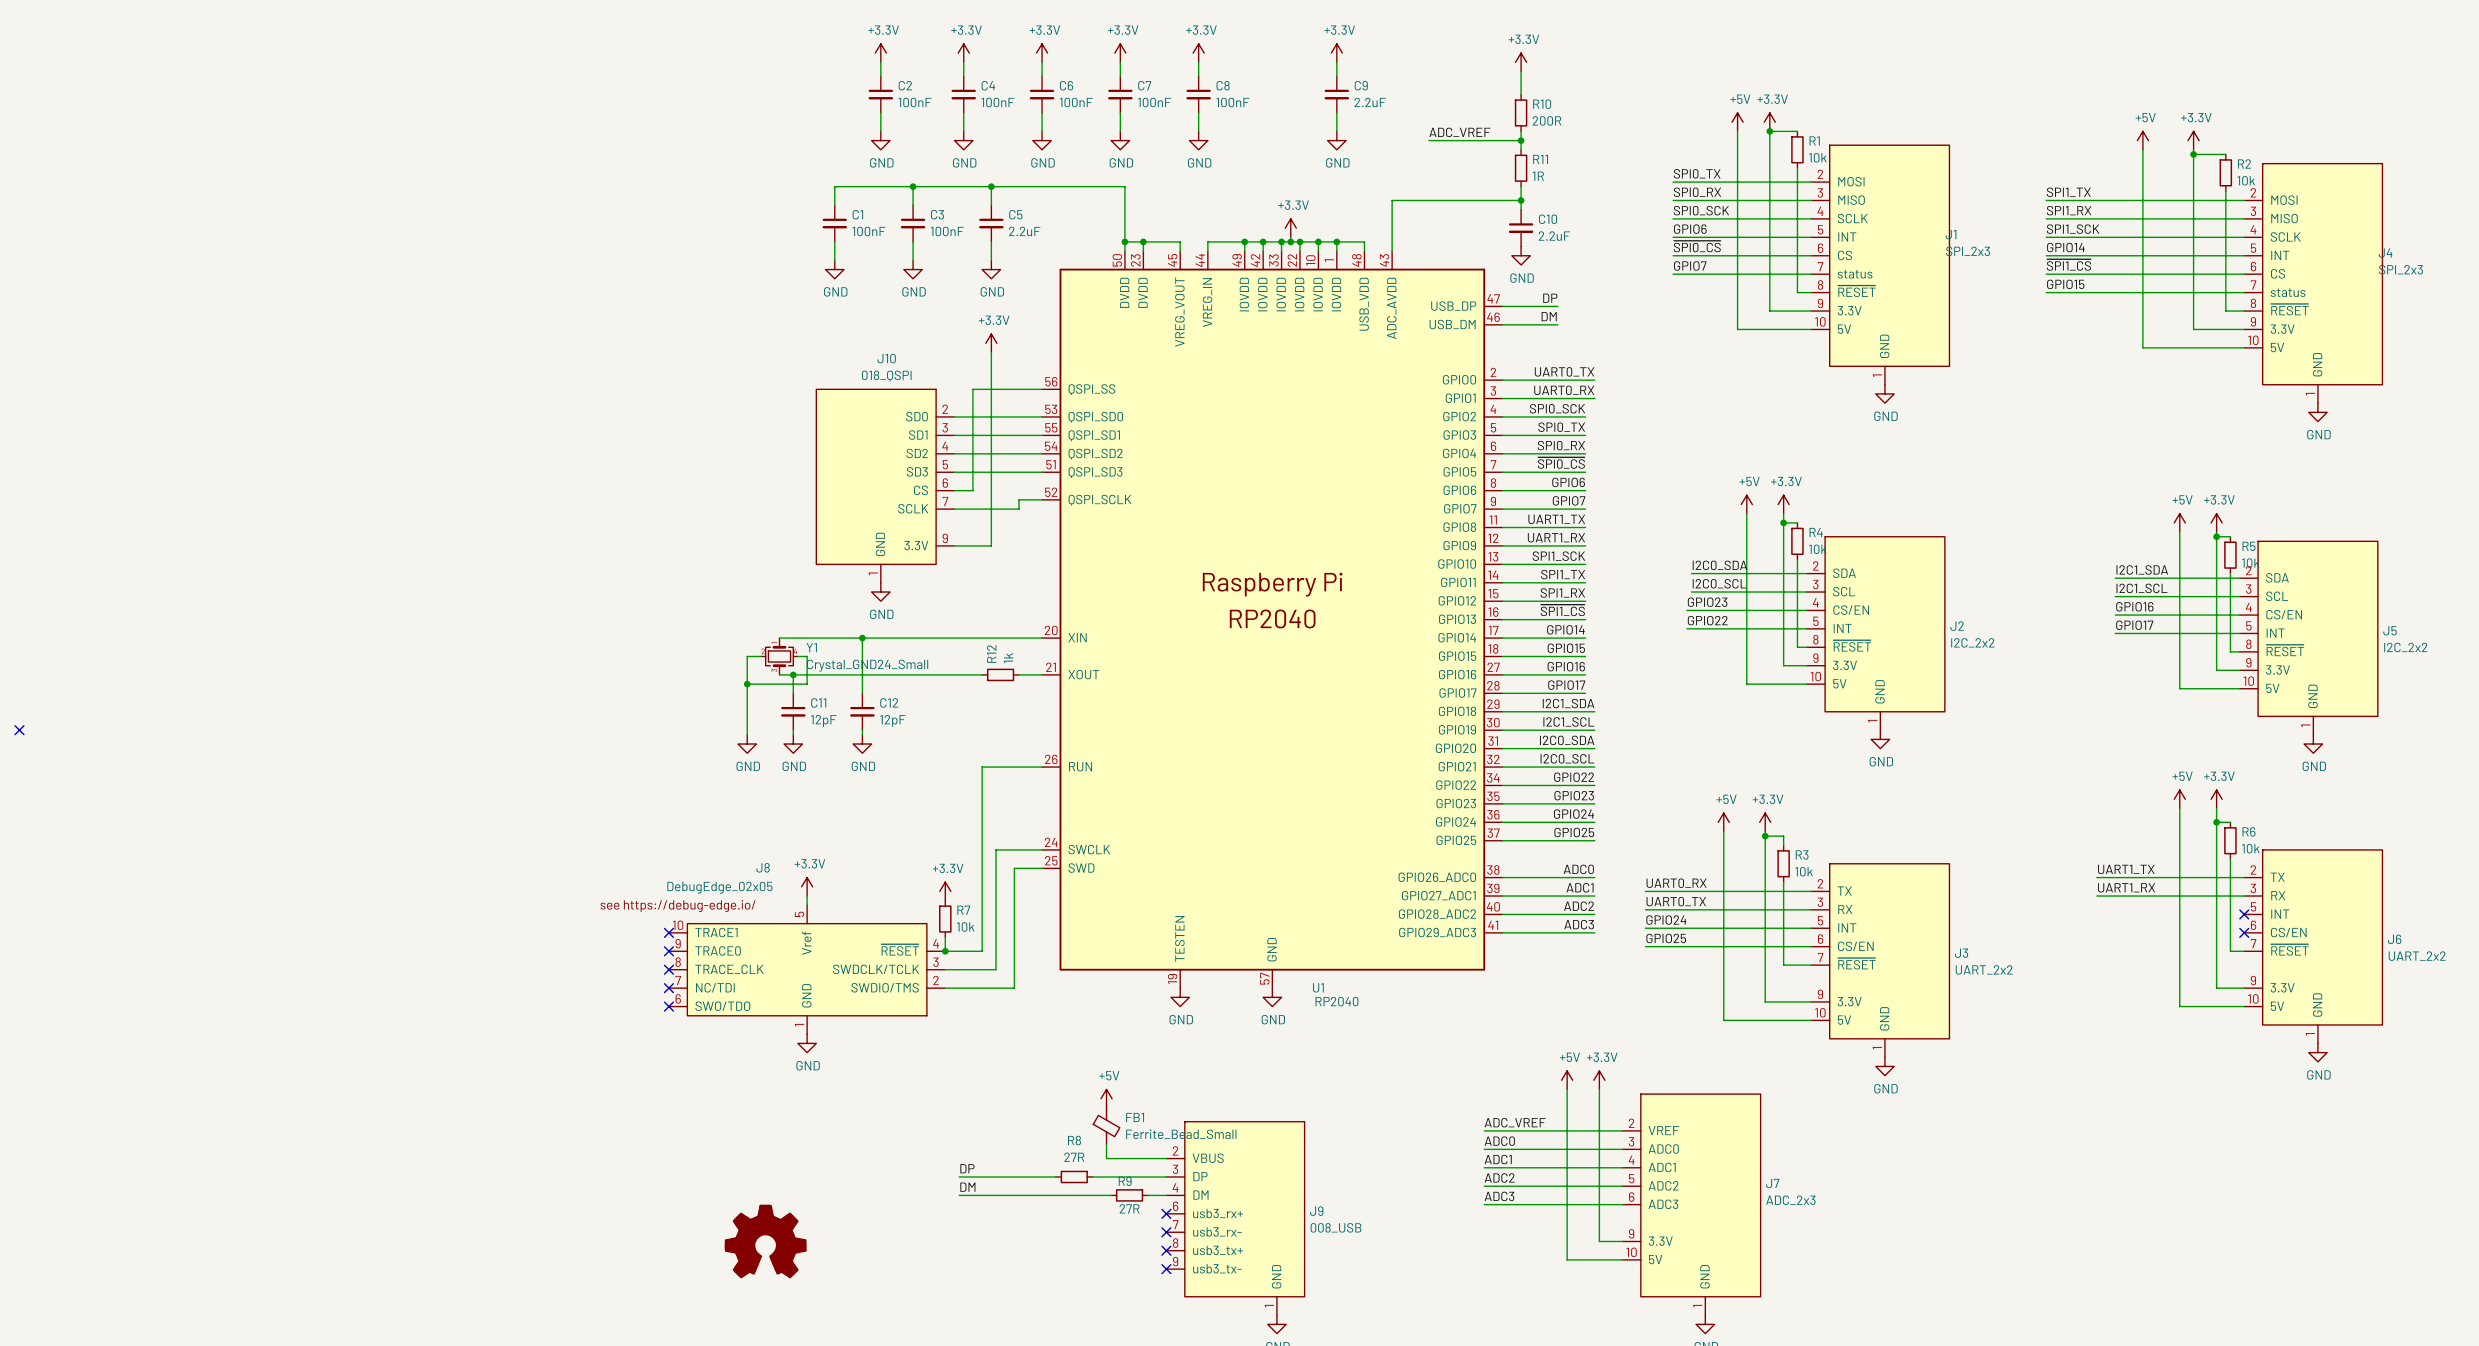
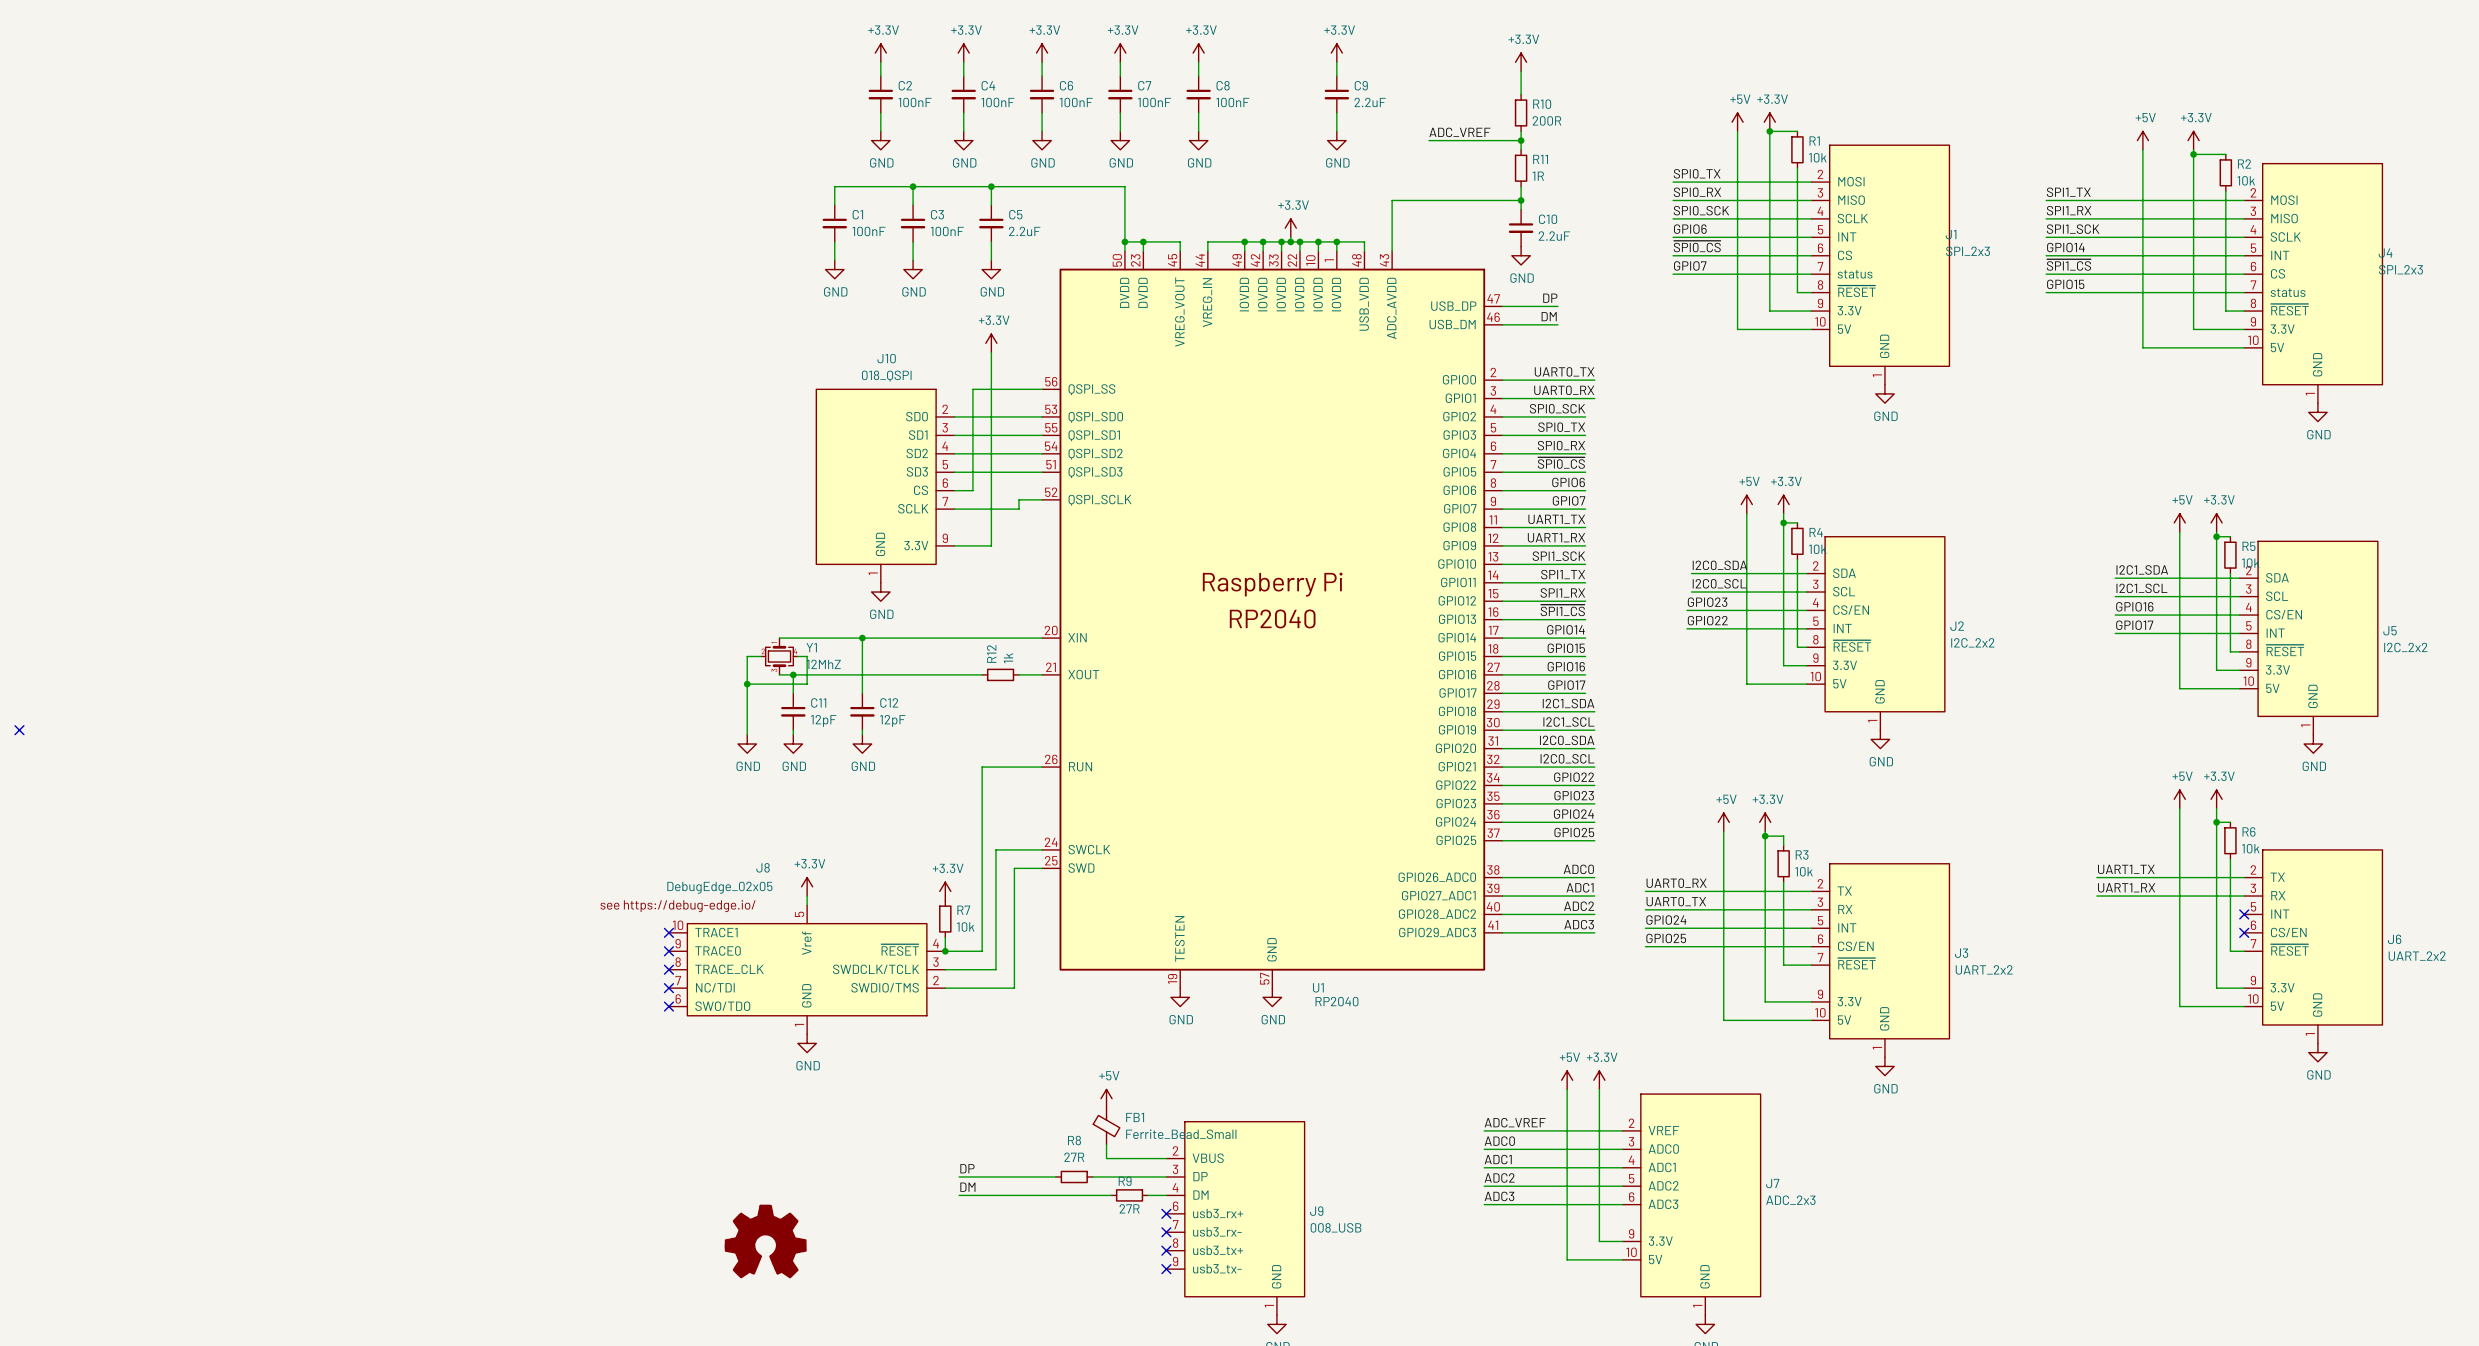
Y1 value: Crystal_GND24_Small (867, 665) -> 12MhZ (823, 664)

